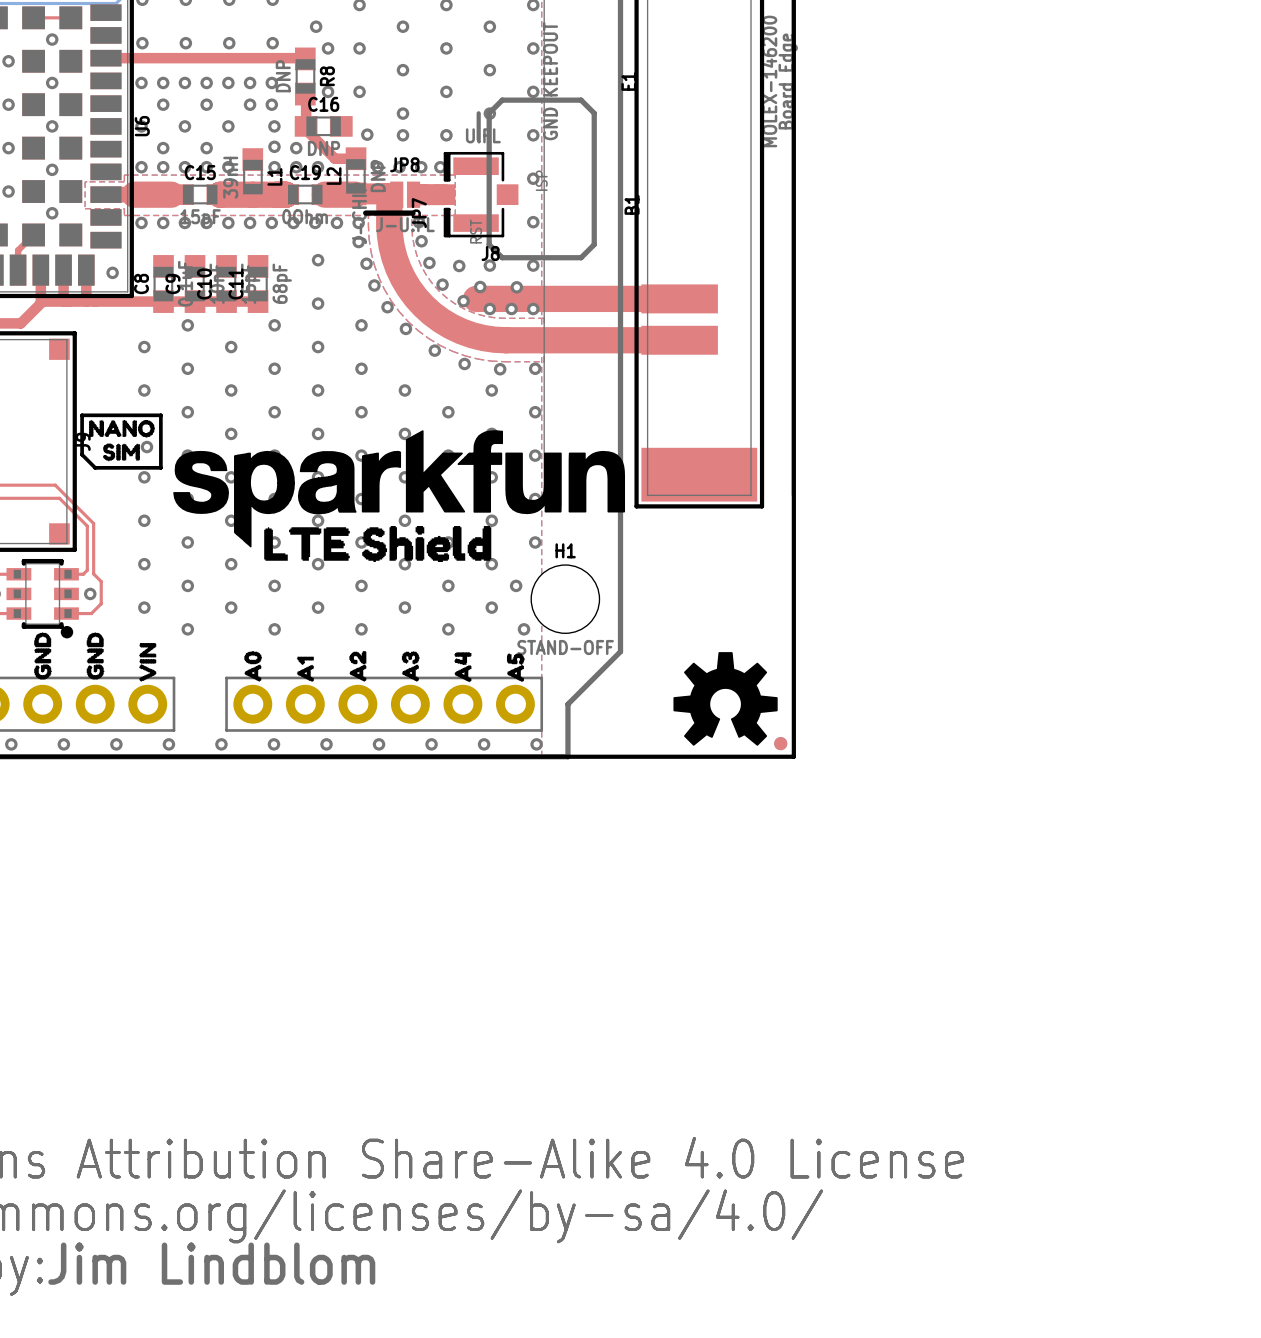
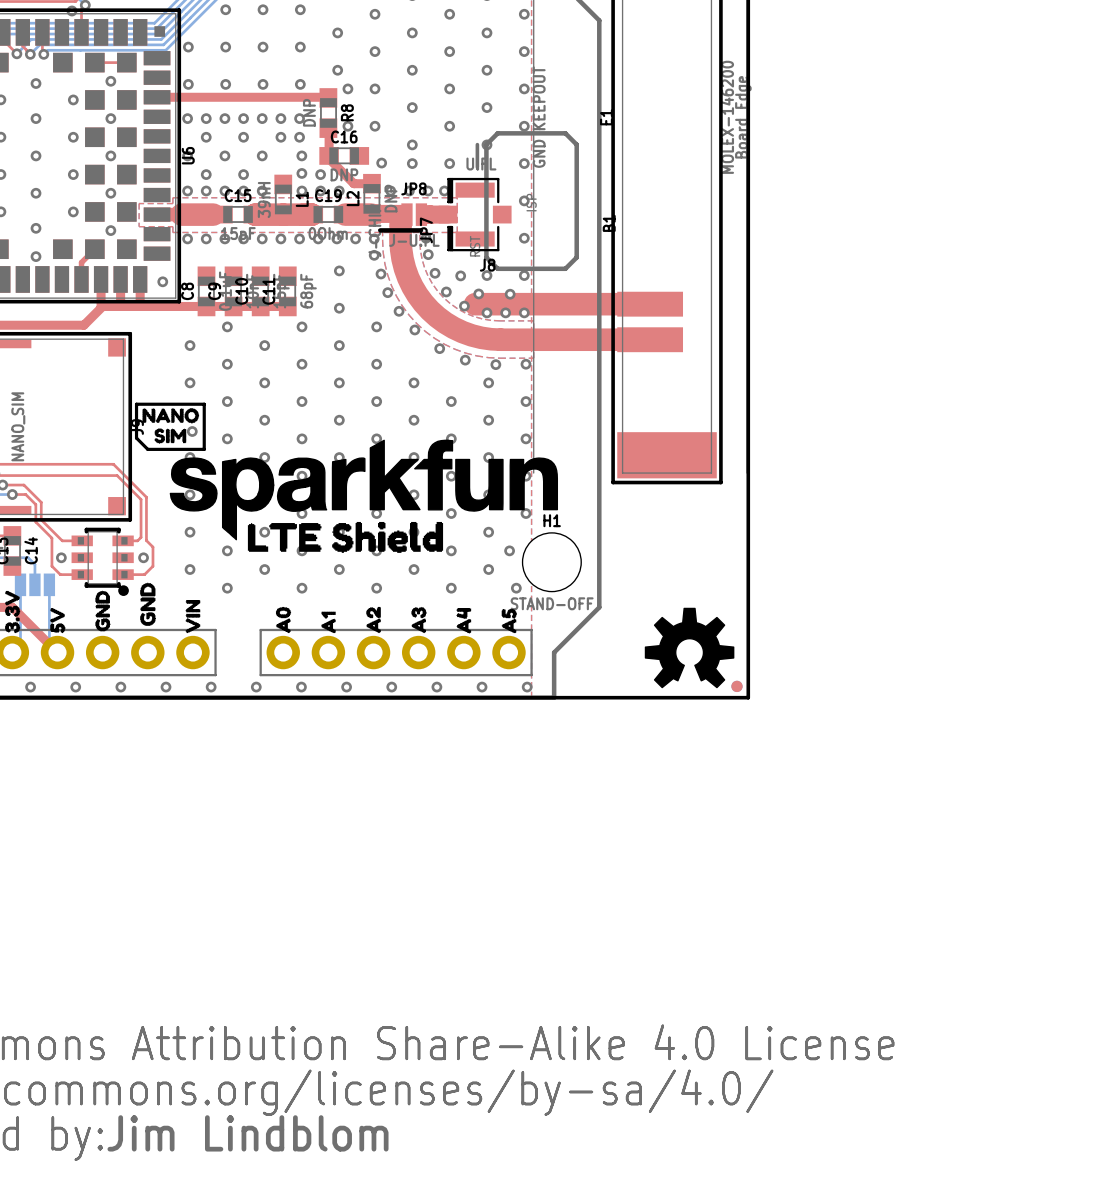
drawing position: (399, 488) -> (363, 490)
drawing position: (377, 544) -> (345, 537)
drawing shape: [86, 632, 105, 680] -> [140, 582, 156, 626]

